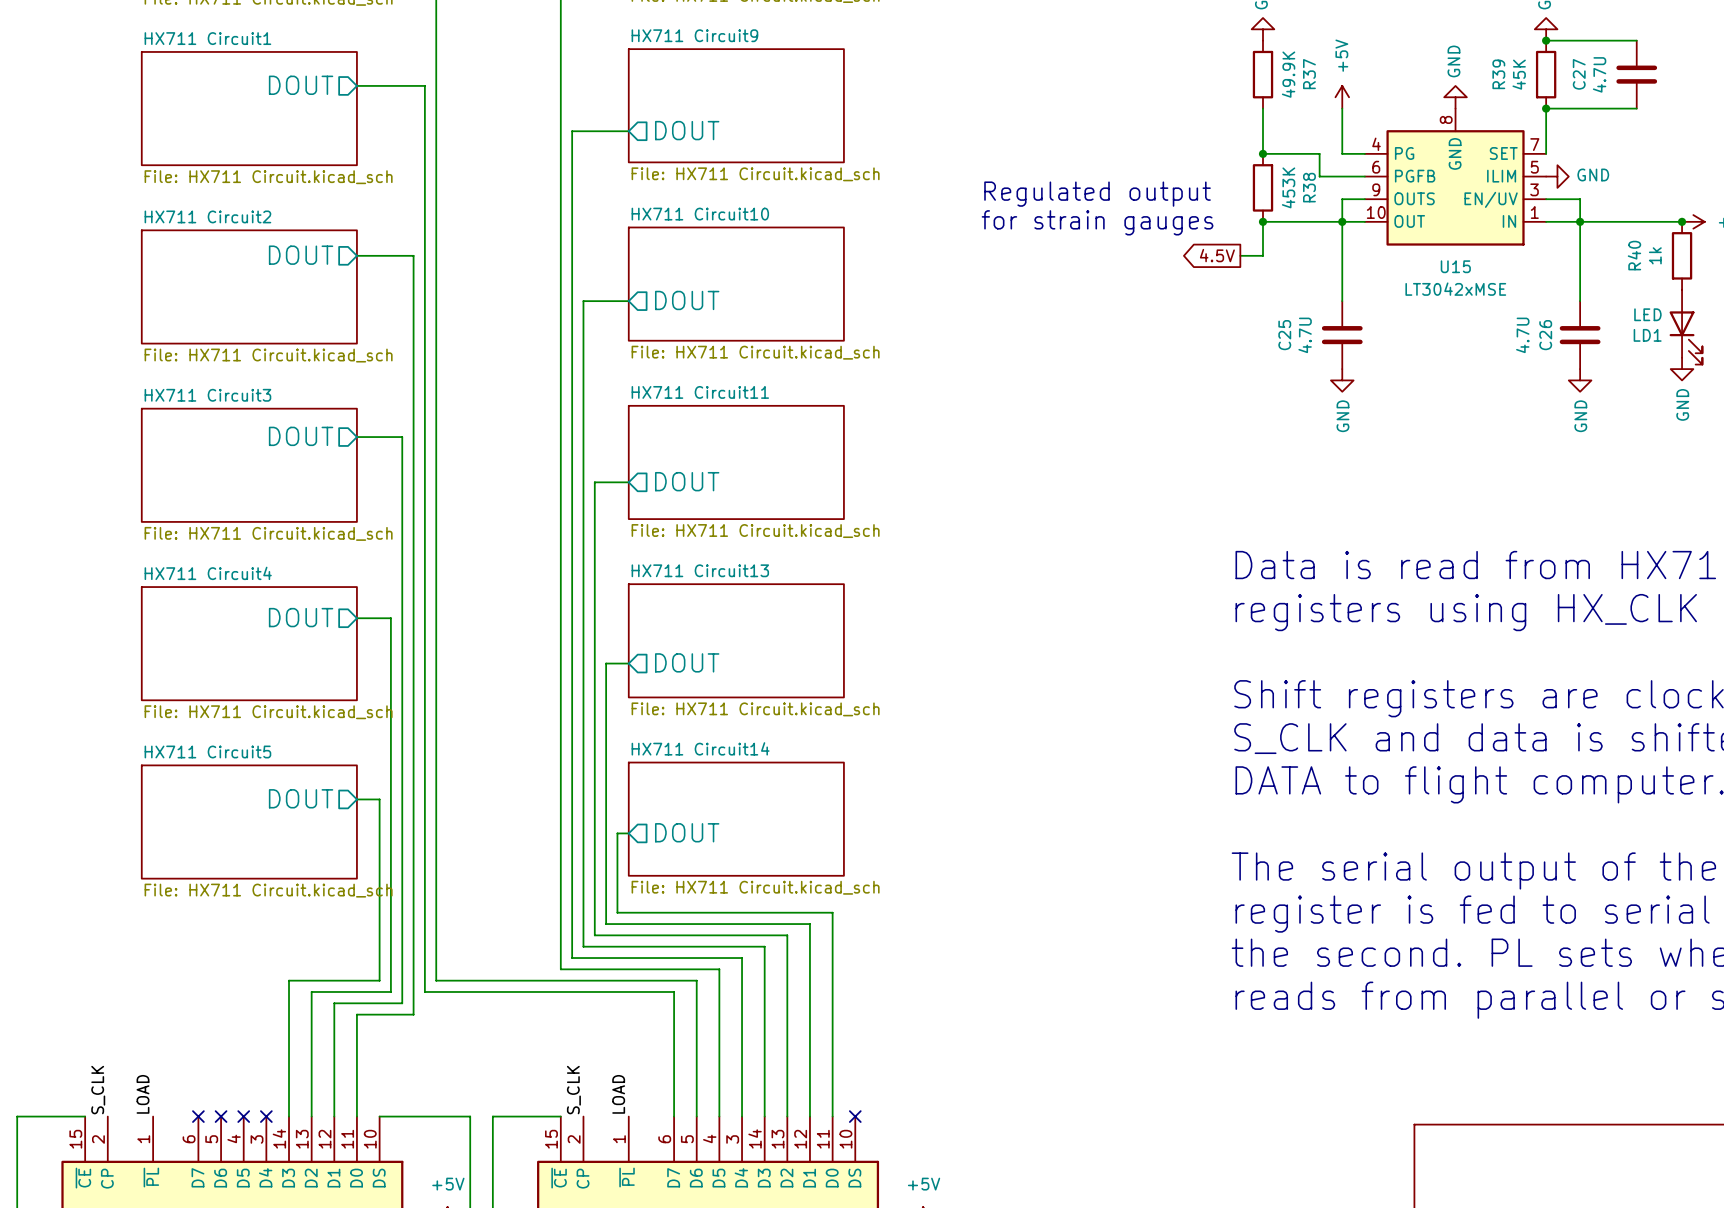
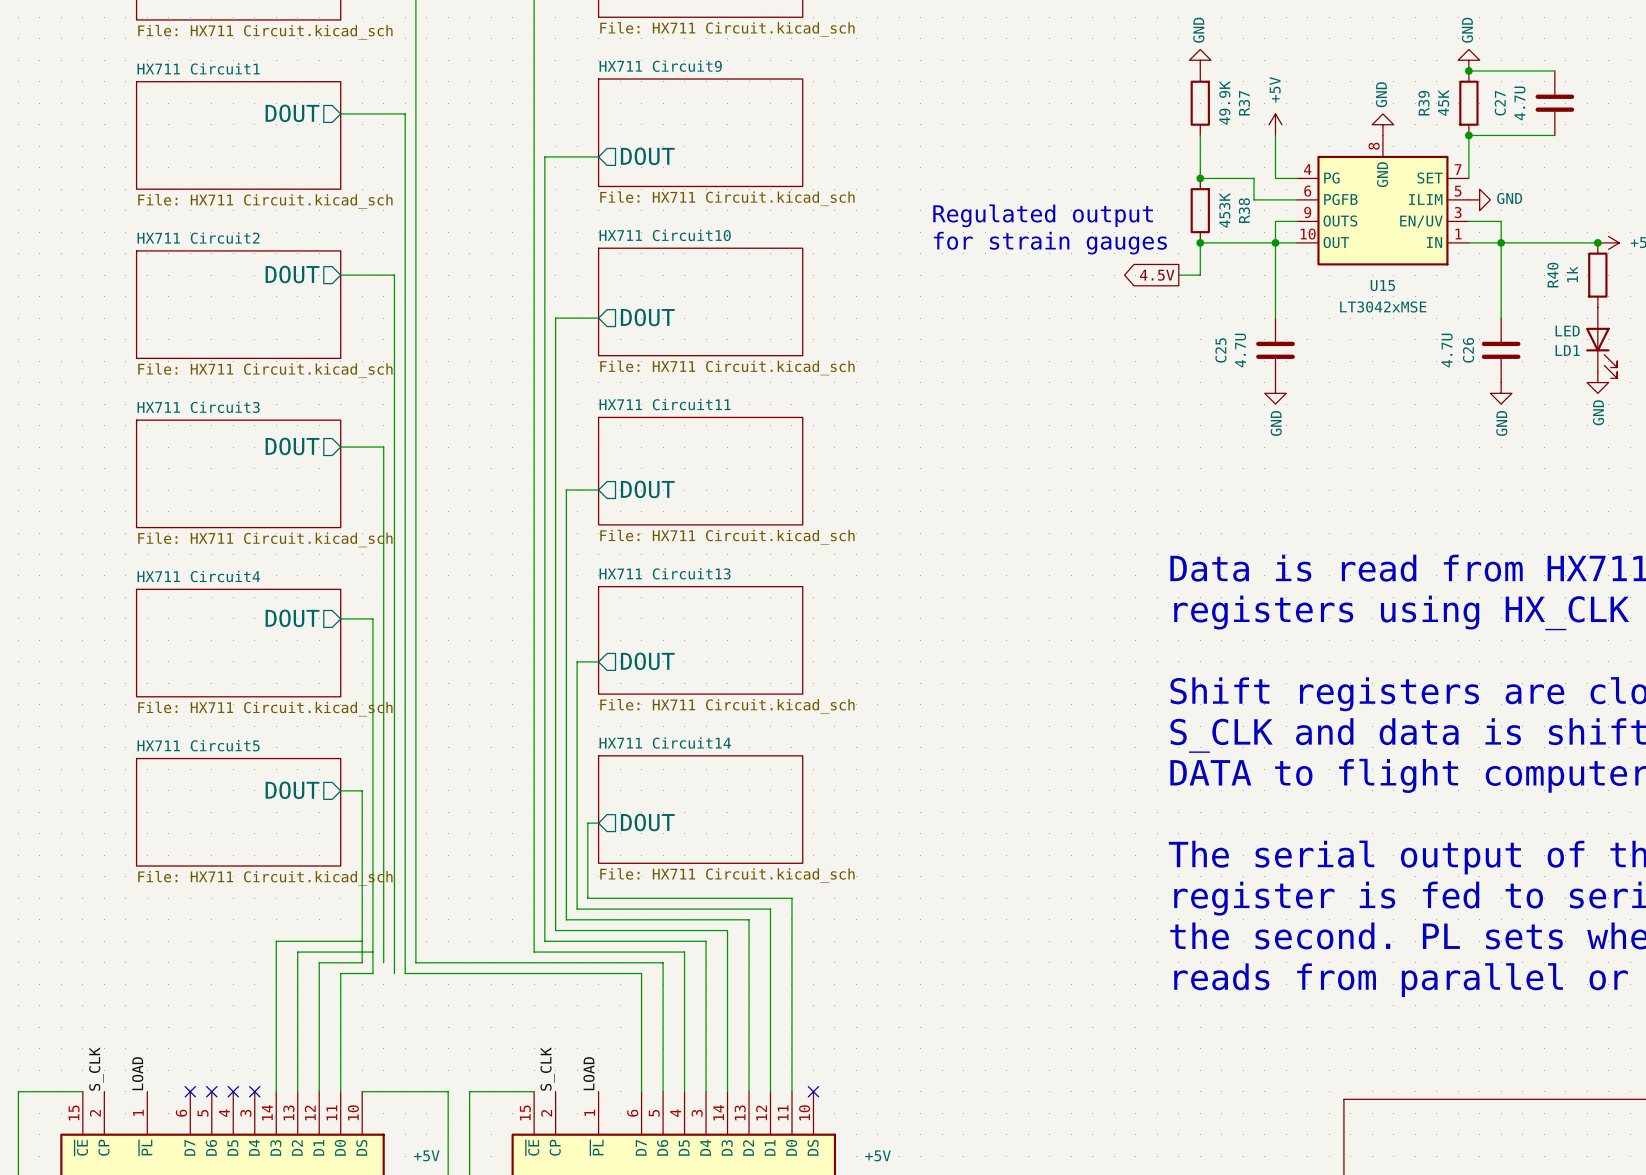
wire: none -> (362, 941) (276, 941) (276, 962)
wire: (289, 980) (334, 980) -> (319, 984) (319, 962)
wire: (402, 980) (402, 1003) (334, 1003) -> none
wire: (311, 991) (356, 991) -> (297, 973) (297, 952) (372, 952)
wire: (413, 991) (413, 1014) (356, 1014) -> (340, 973) (340, 995)

